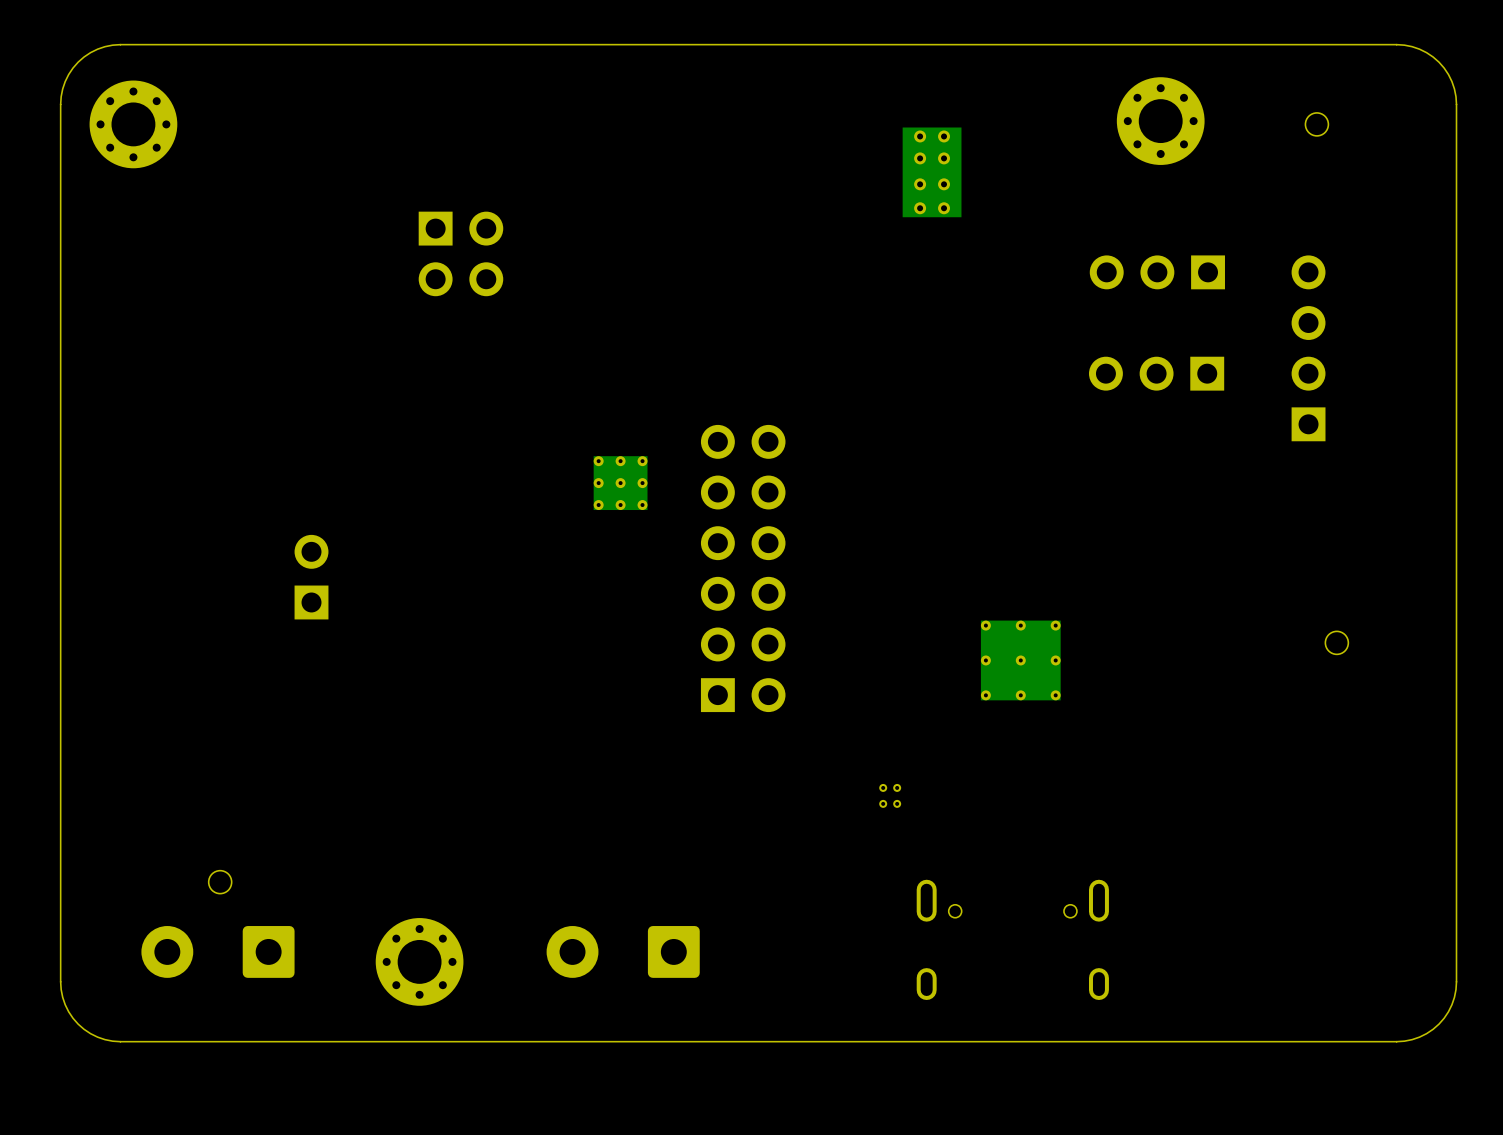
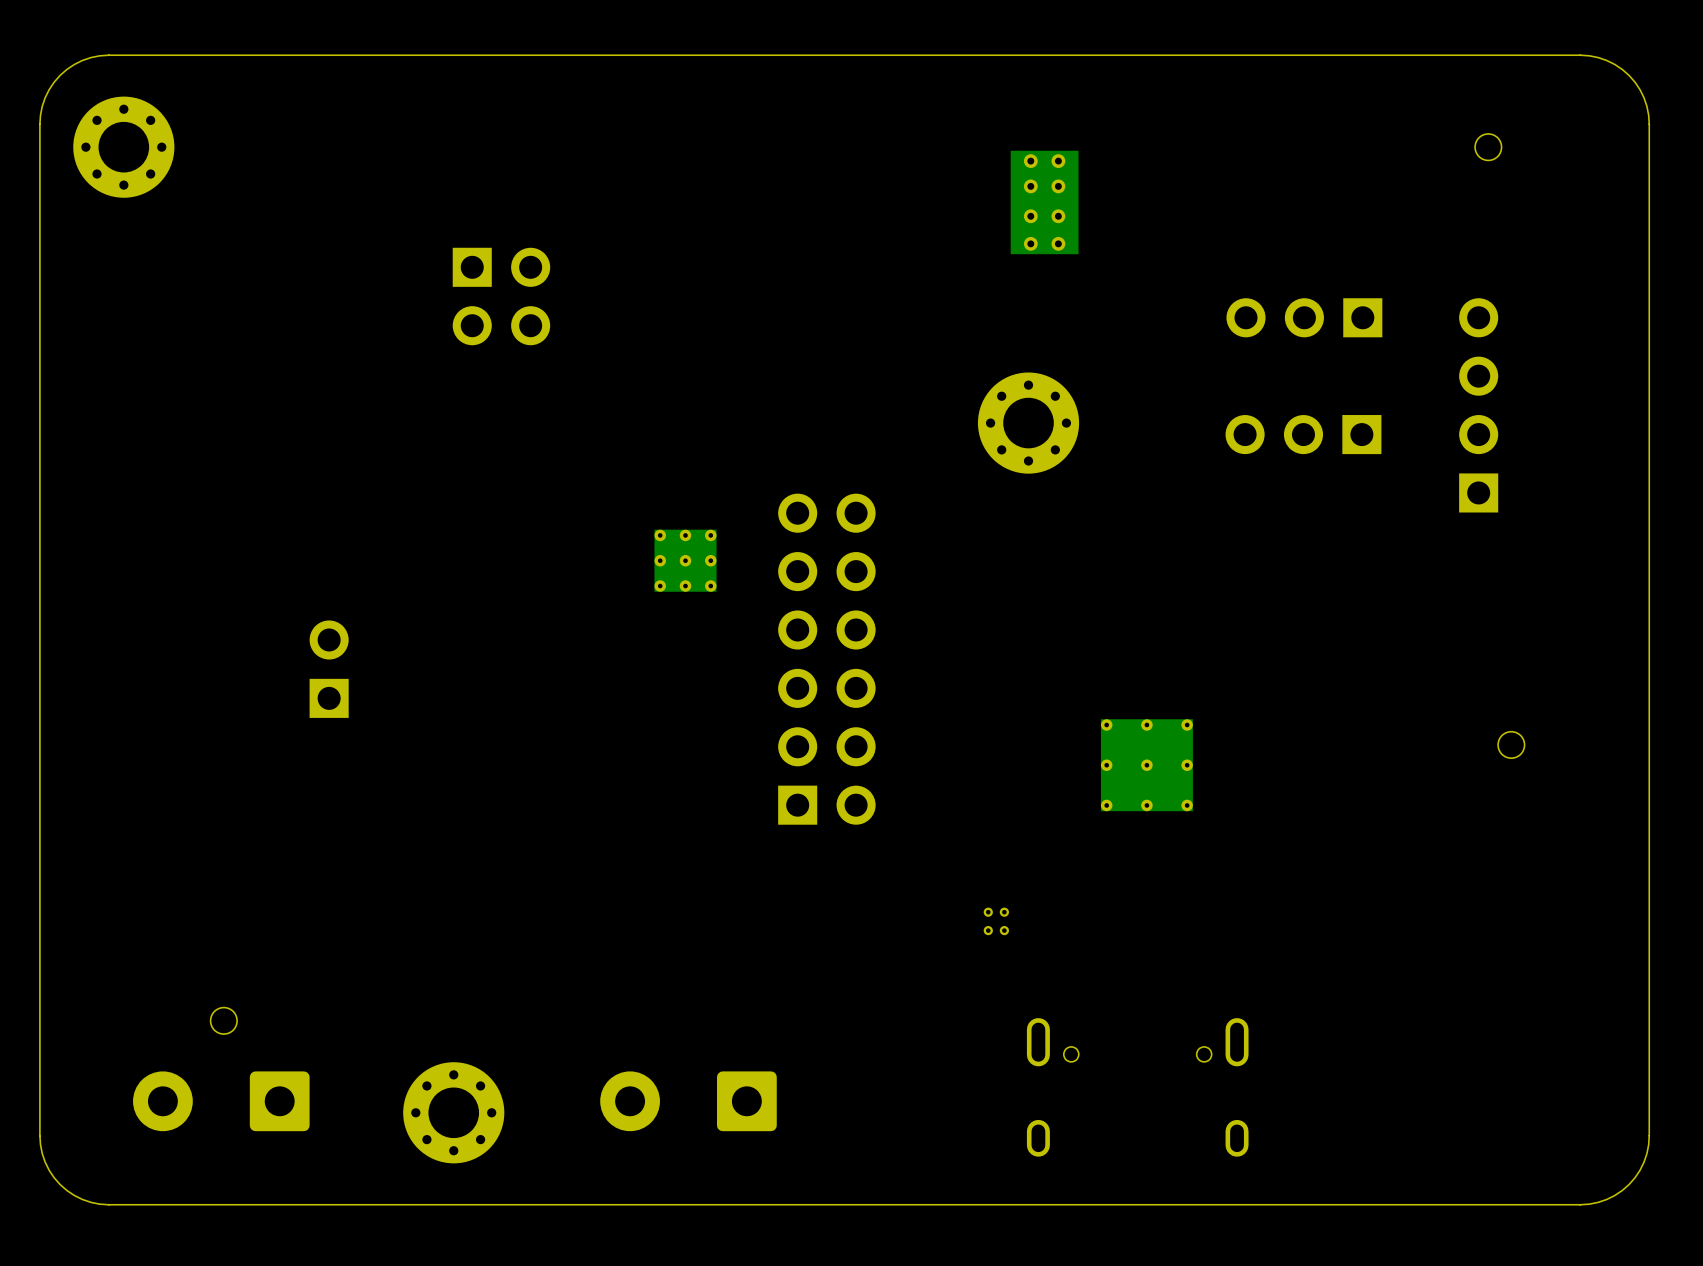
part position: (1160, 121) -> (1028, 423)

